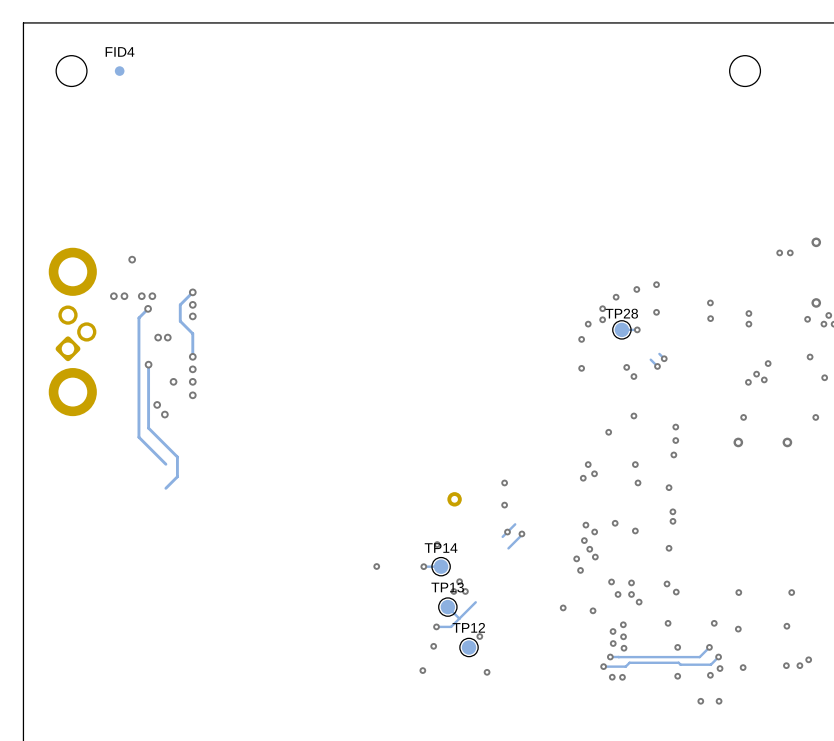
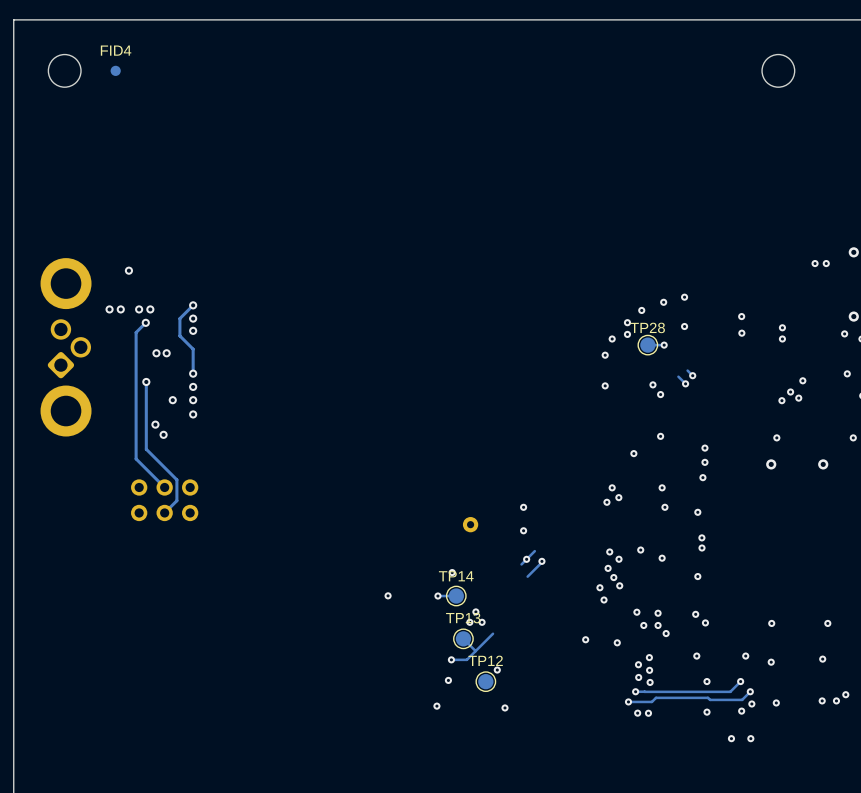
part: none -> (164, 500)

